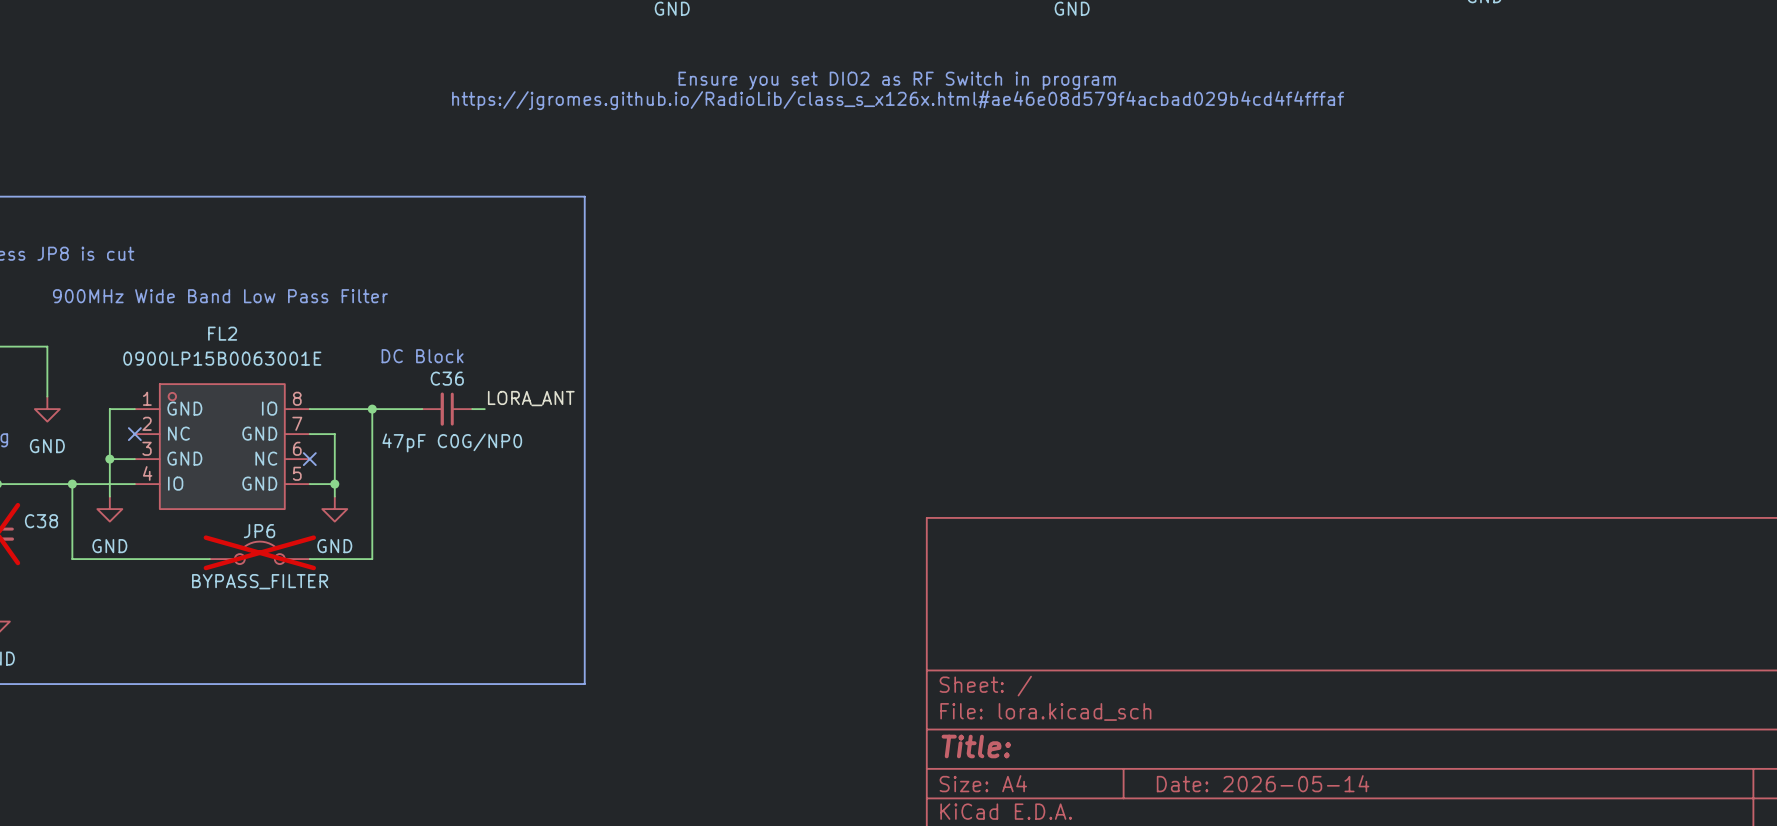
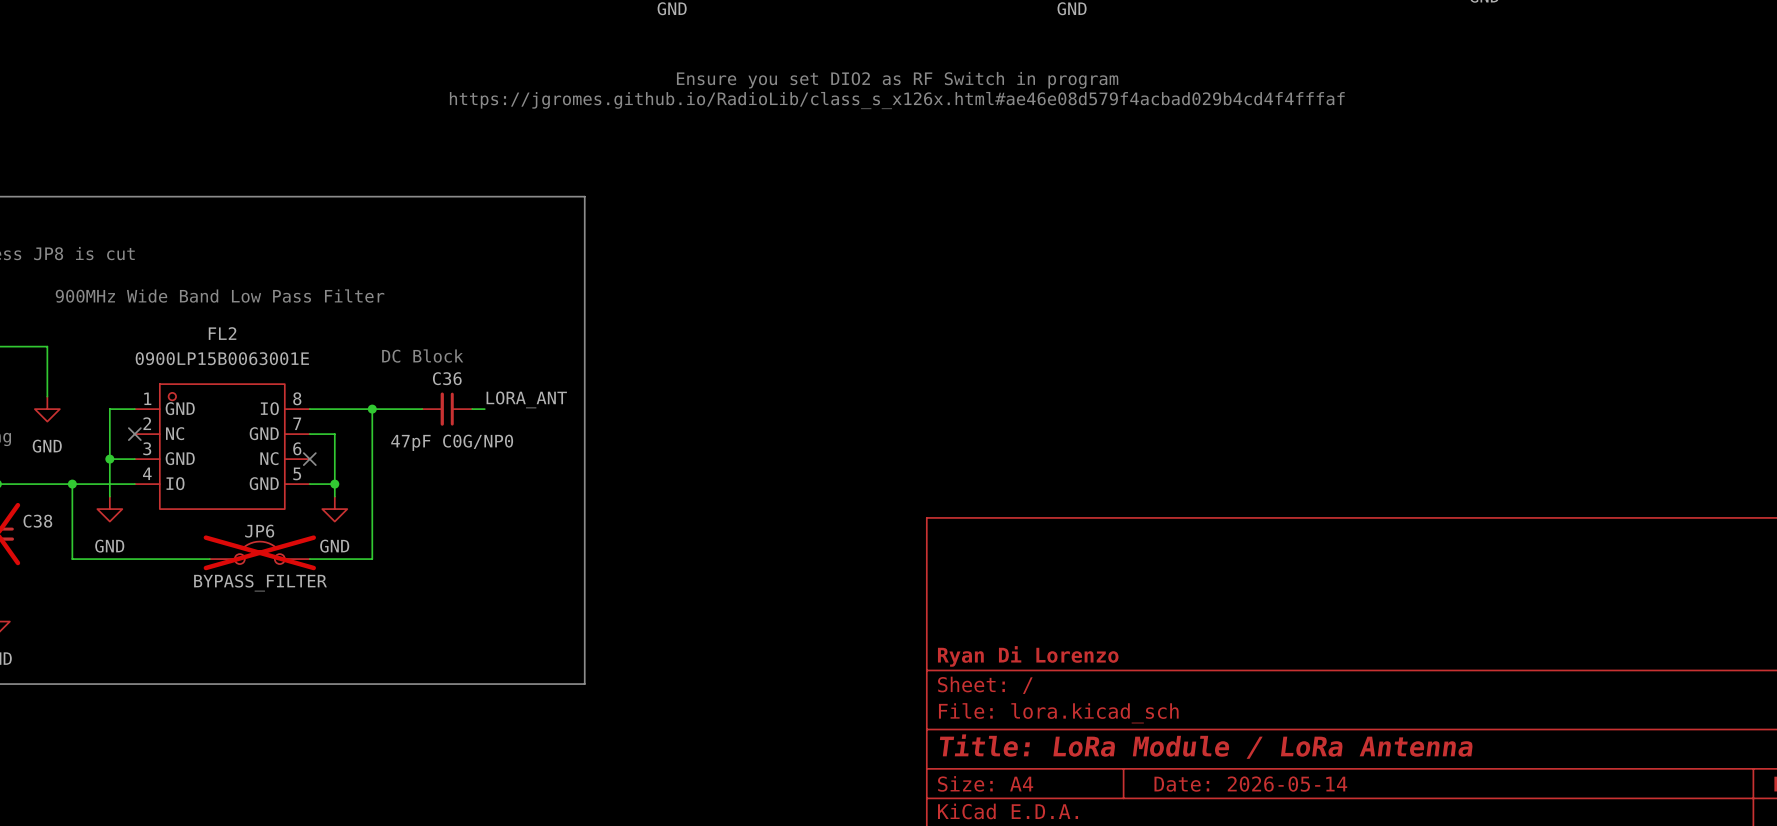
title block: none -> Ryan Di Lorenzo (1028, 656)
title block: Title: (976, 746) -> Title: LoRa Module / LoRa Antenna (1206, 746)

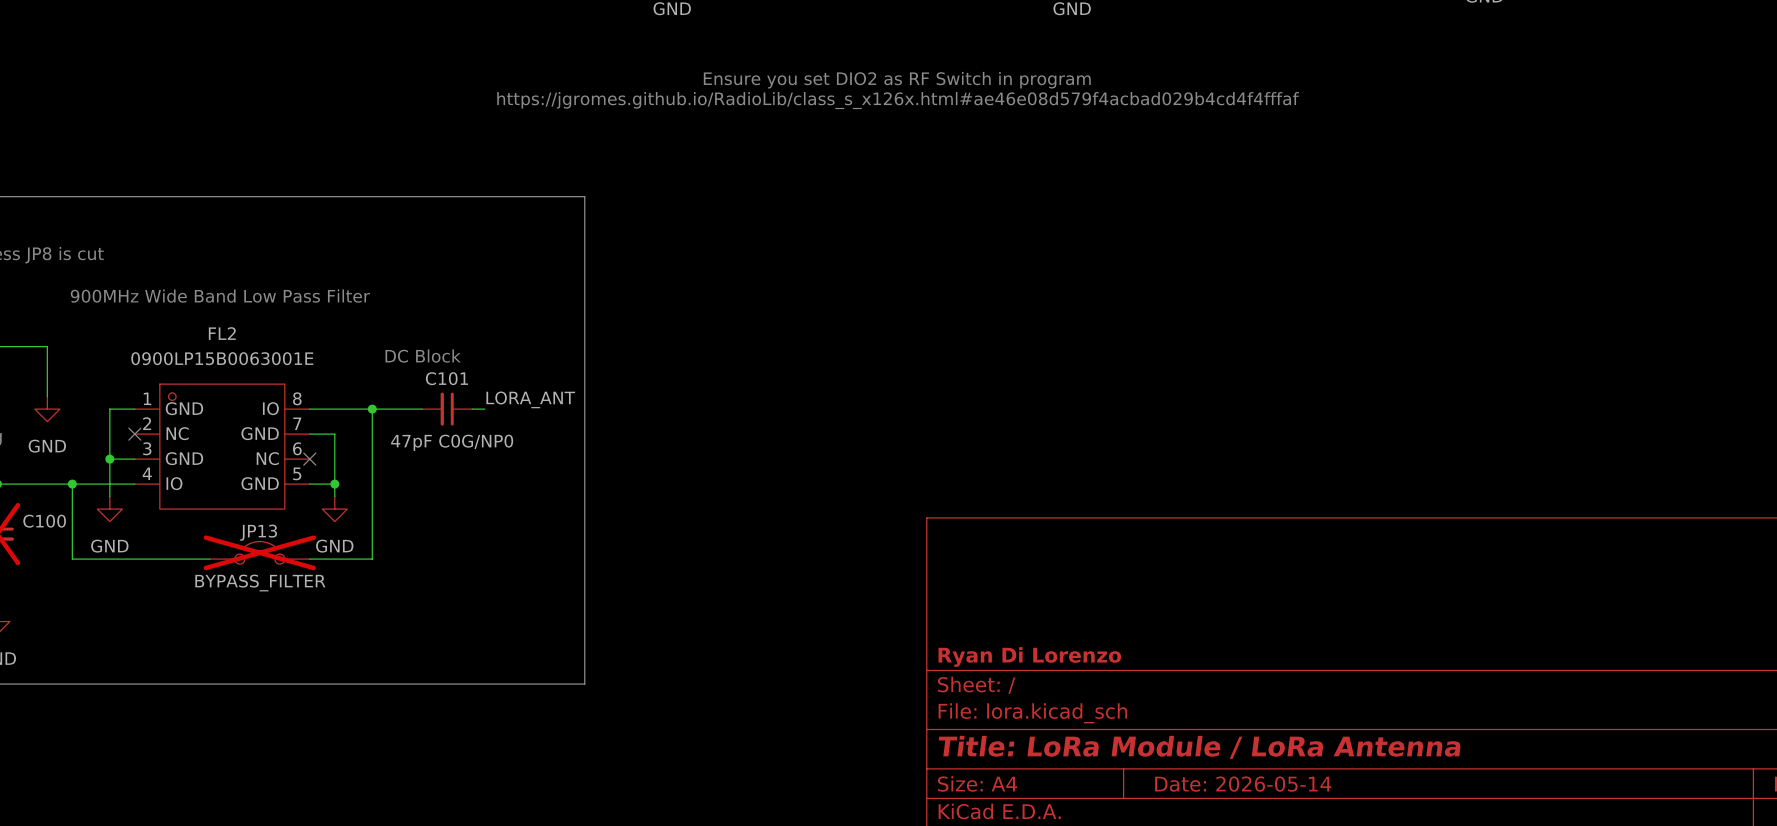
C36 name: C36 (447, 378) -> C101 (446, 378)
C38 name: C38 (37, 521) -> C100 (44, 521)
JP6 name: JP6 (259, 531) -> JP13 (258, 532)

